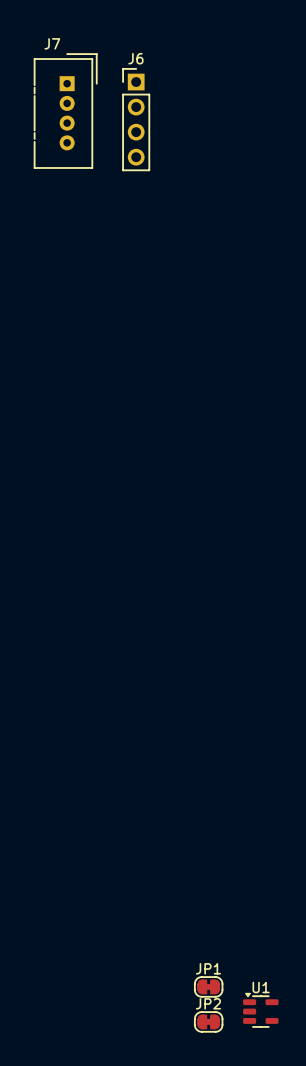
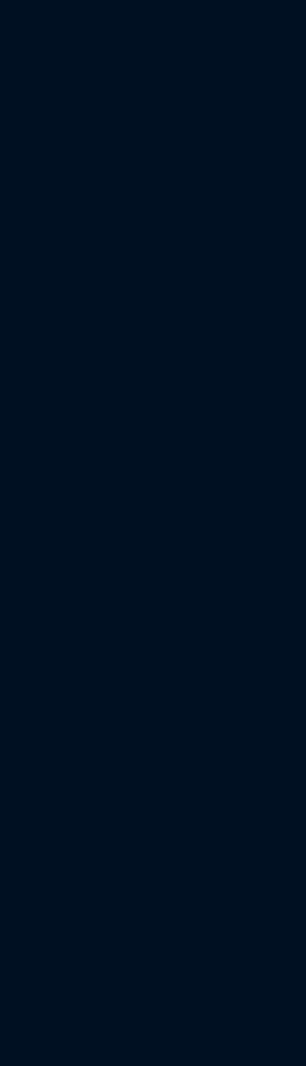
J7: (65, 111) -> none
J6: (136, 119) -> none
JP1: (208, 986) -> none
U1: (260, 1010) -> none
JP2: (208, 1021) -> none

